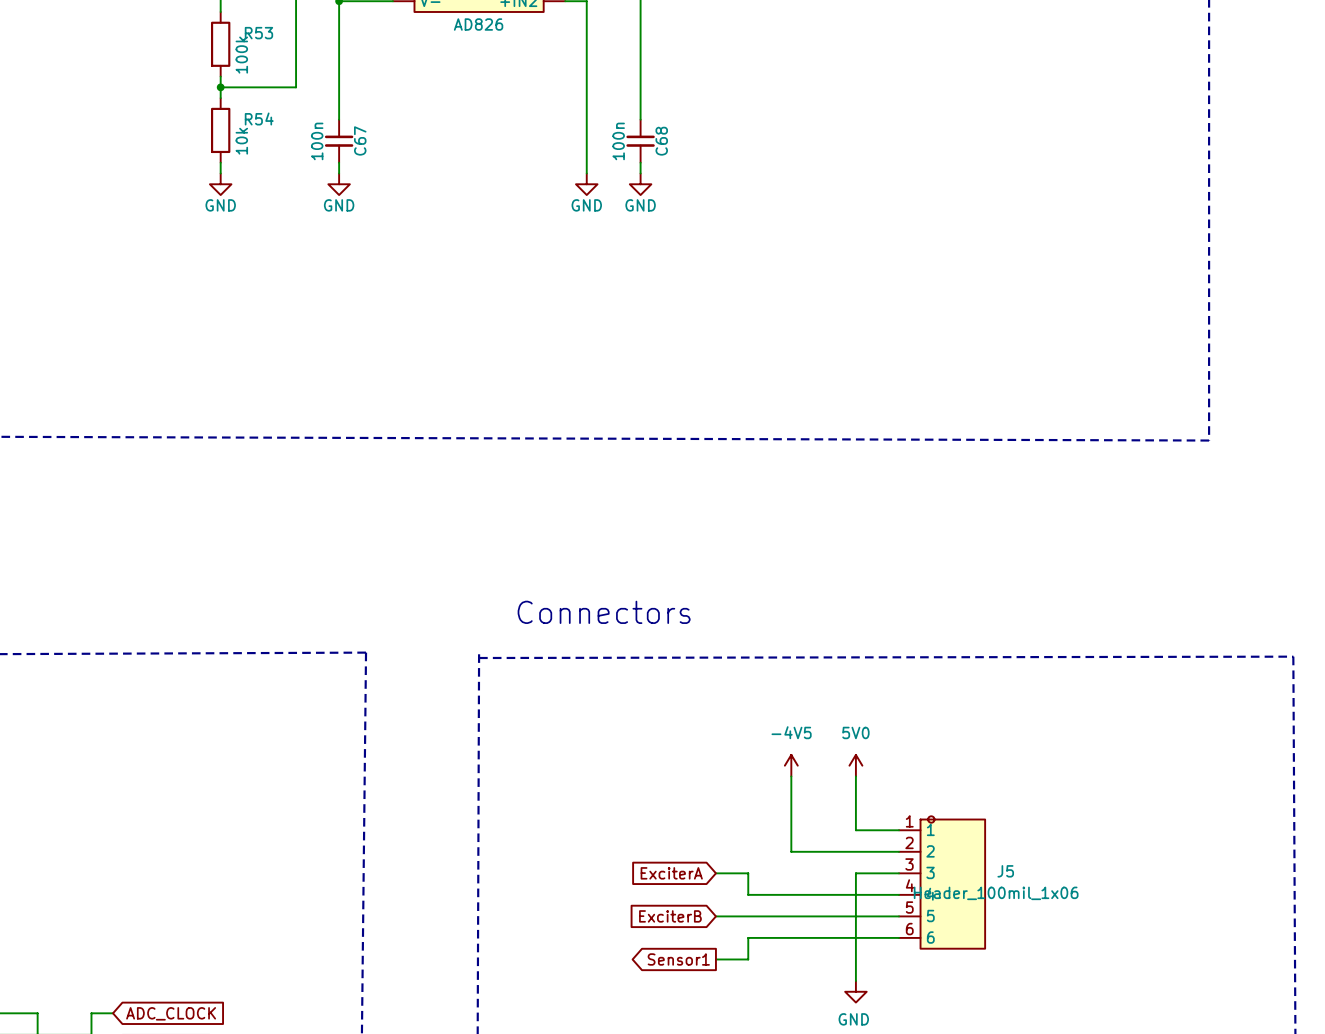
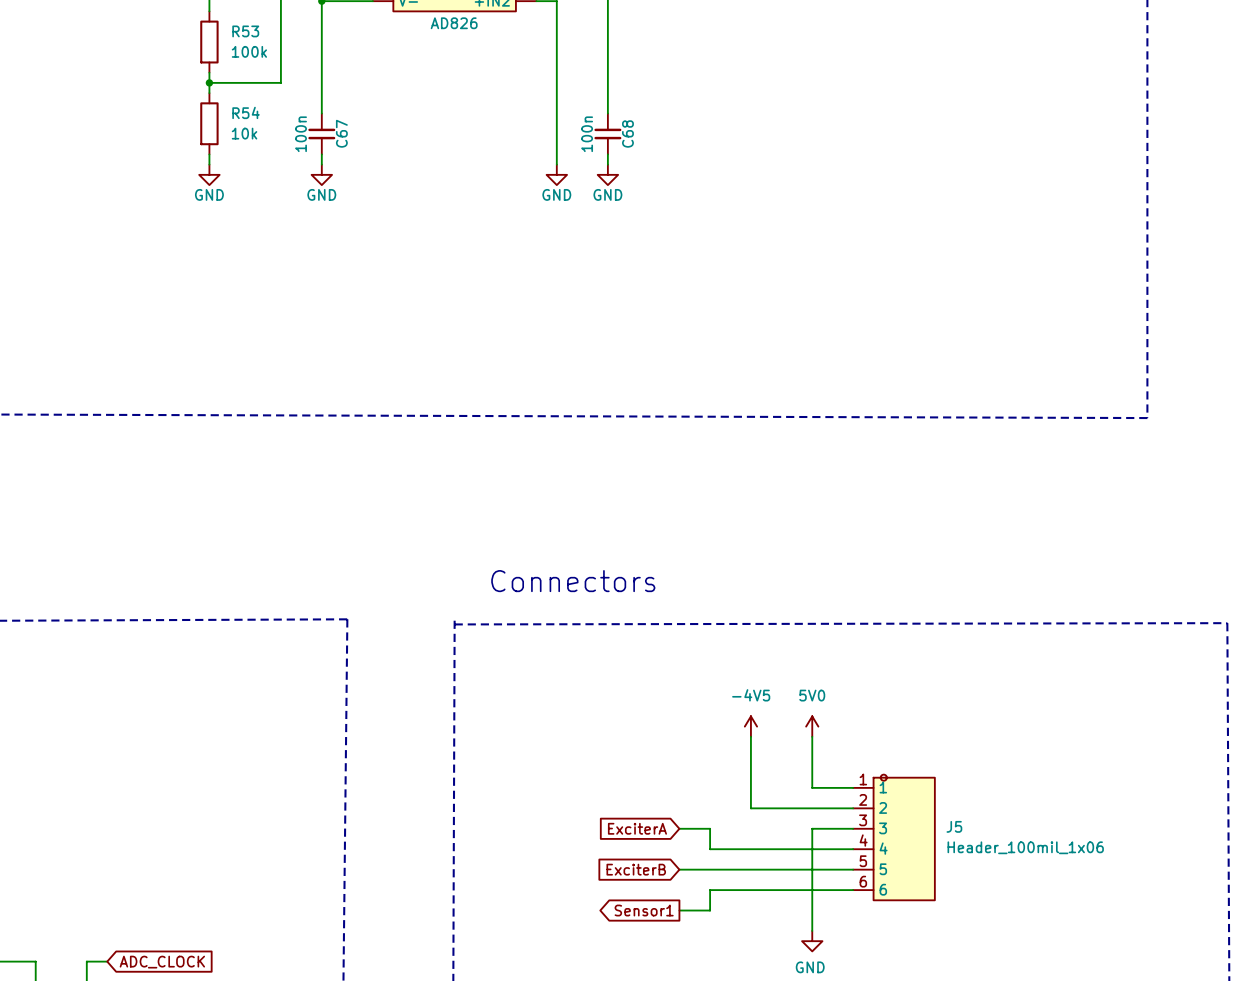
R53 value rotation: 0° (241, 55) -> 90° clockwise (249, 51)
R54 value rotation: 0° (241, 141) -> 90° clockwise (244, 133)
J5 value position: Header_100mil_1x06 (996, 893) -> Header_100mil_1x06 (1025, 847)

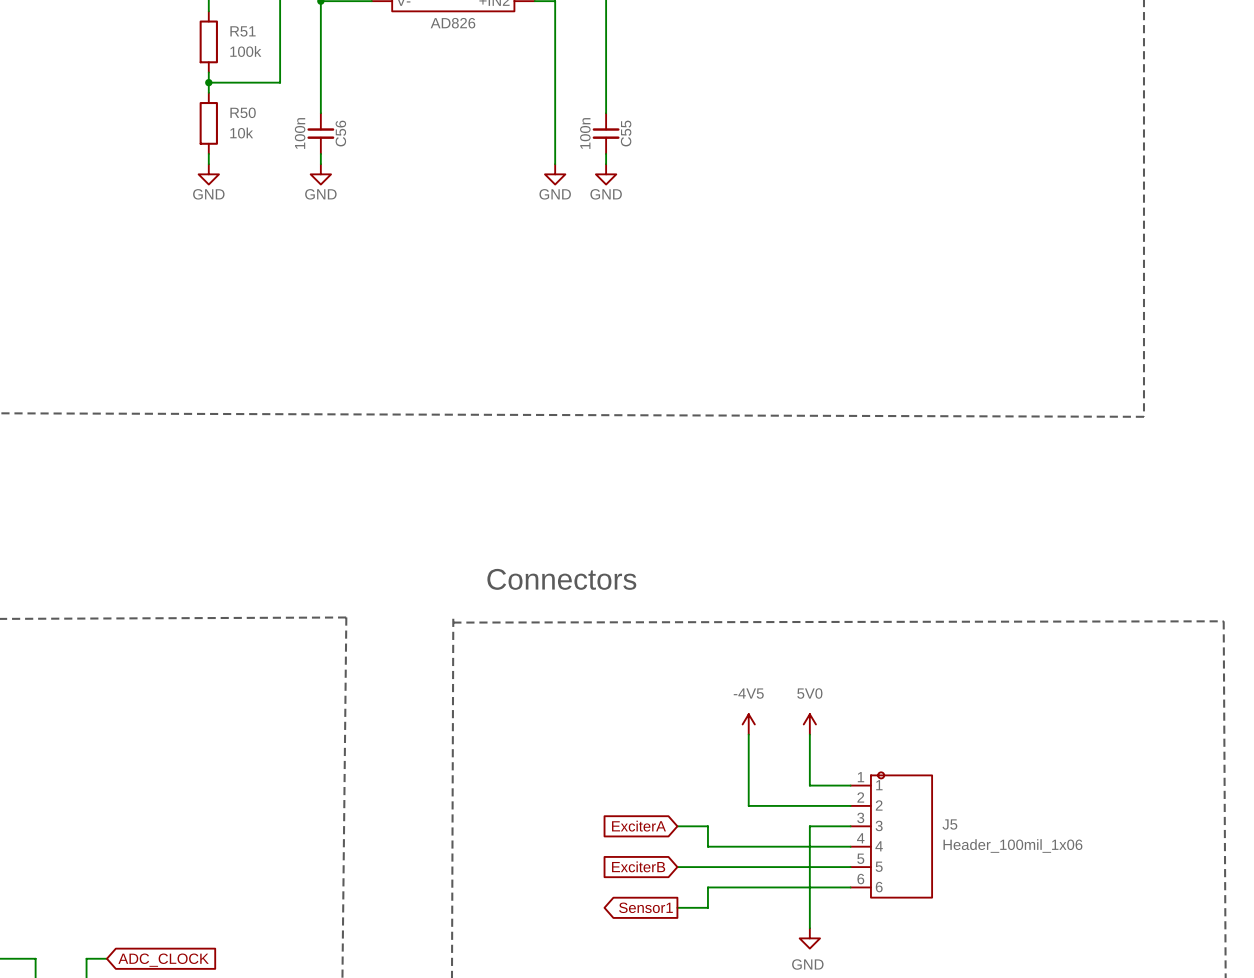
R53 name: R53 (245, 31) -> R51 (243, 31)
R54 name: R54 (245, 112) -> R50 (243, 112)
C67 name: C67 (341, 133) -> C56 (340, 133)
C68 name: C68 (627, 133) -> C55 (626, 133)

